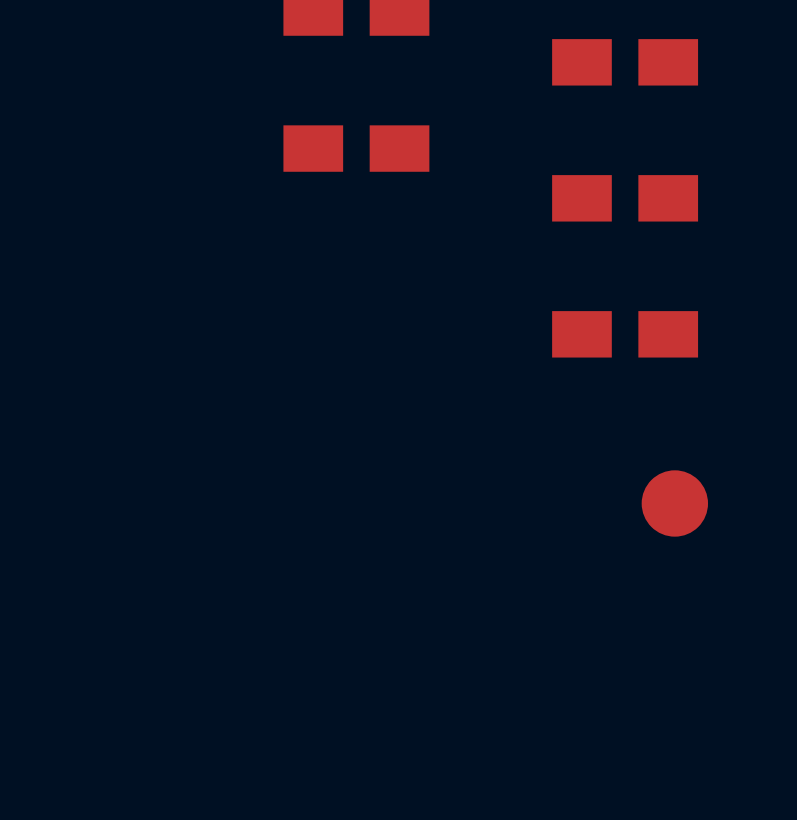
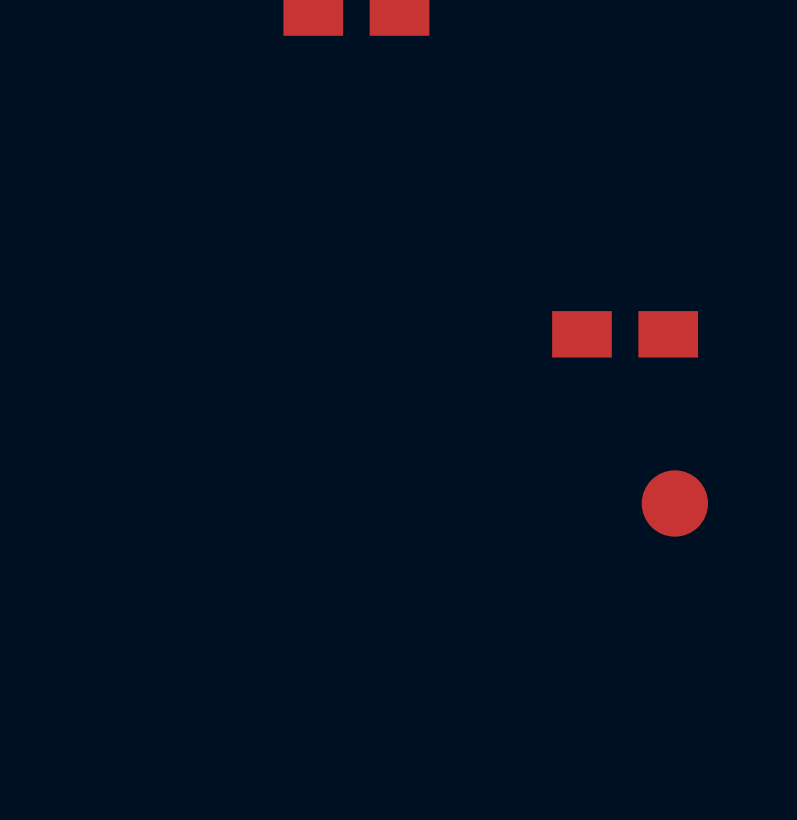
part: (625, 62) -> none
part: (356, 148) -> none
part: (625, 198) -> none

